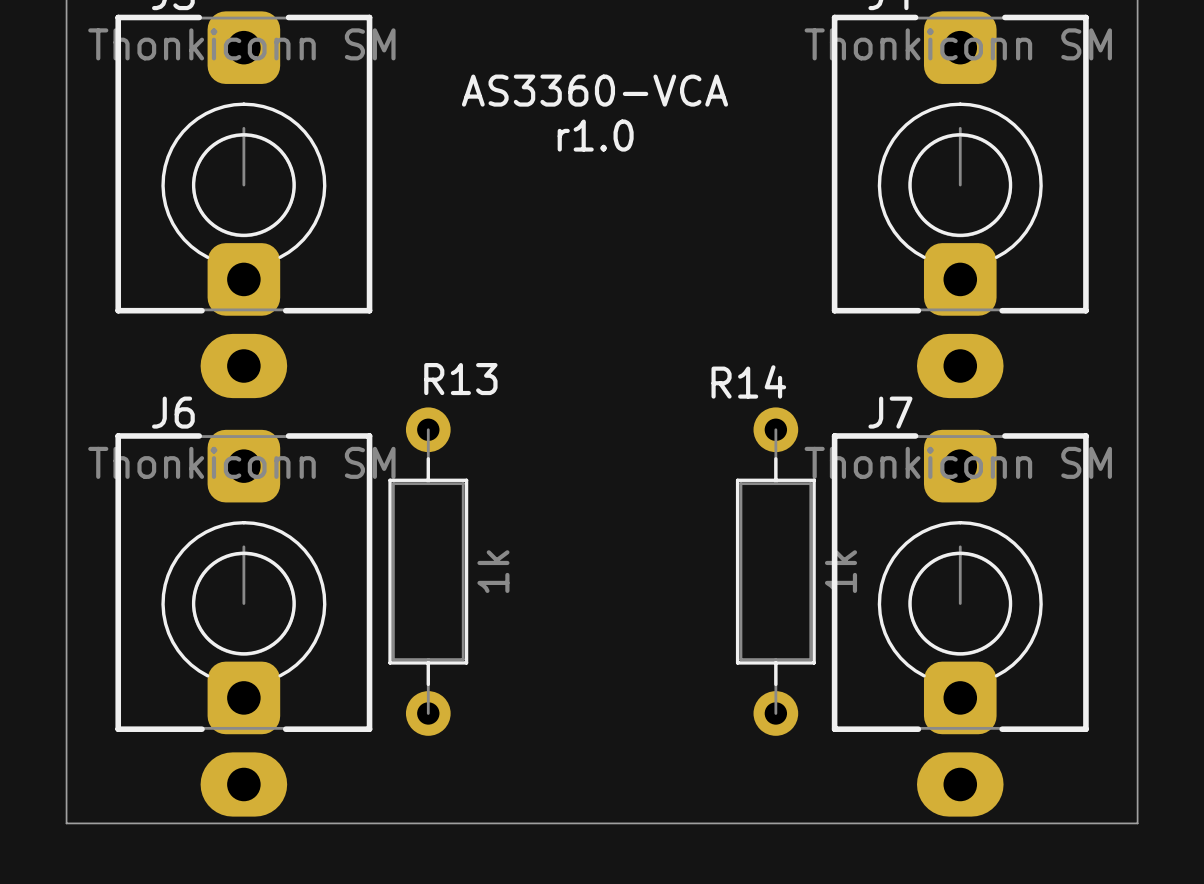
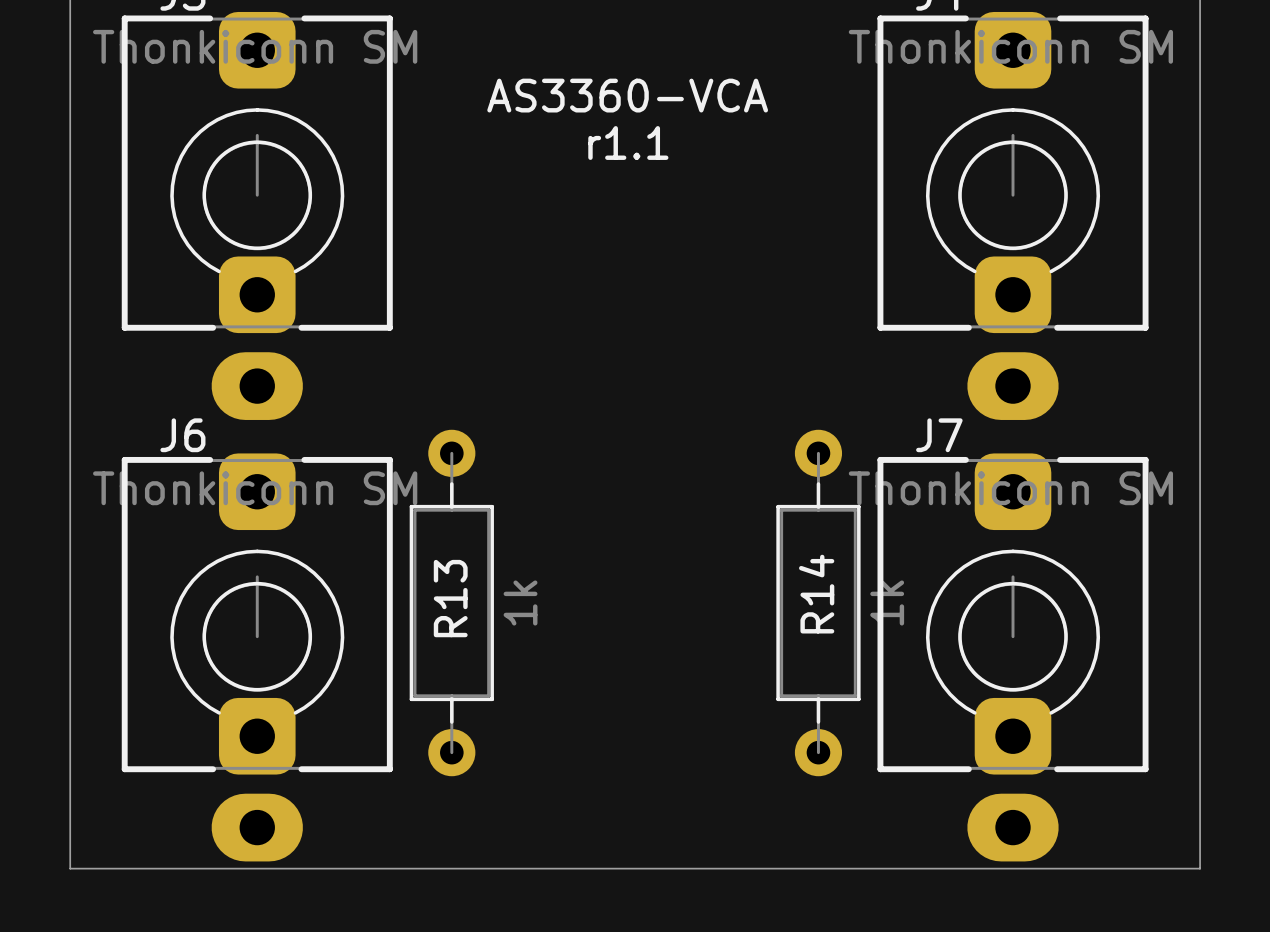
text: r1.0 (595, 135) -> r1.1 (628, 142)
R13 name rotation: 0° (460, 379) -> 90° counterclockwise (450, 598)
R13 name position: R13 (460, 379) -> R13 (450, 598)
R14 name rotation: 0° (748, 381) -> 90° counterclockwise (816, 594)
R14 name position: R14 (748, 381) -> R14 (816, 594)

